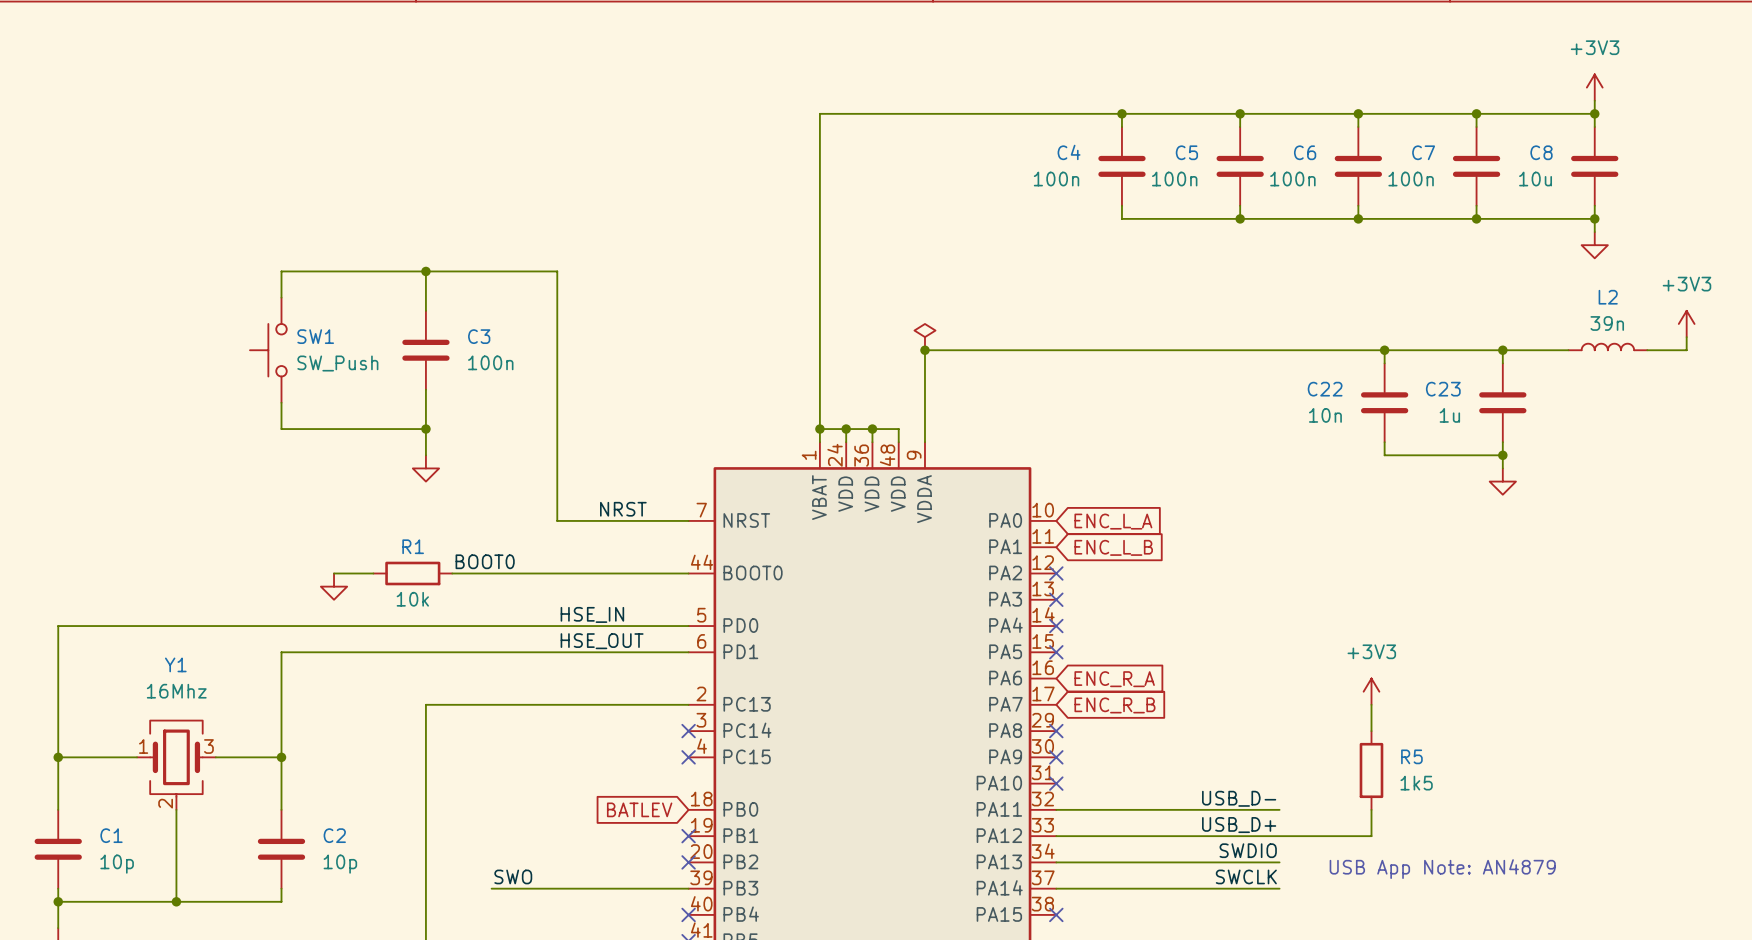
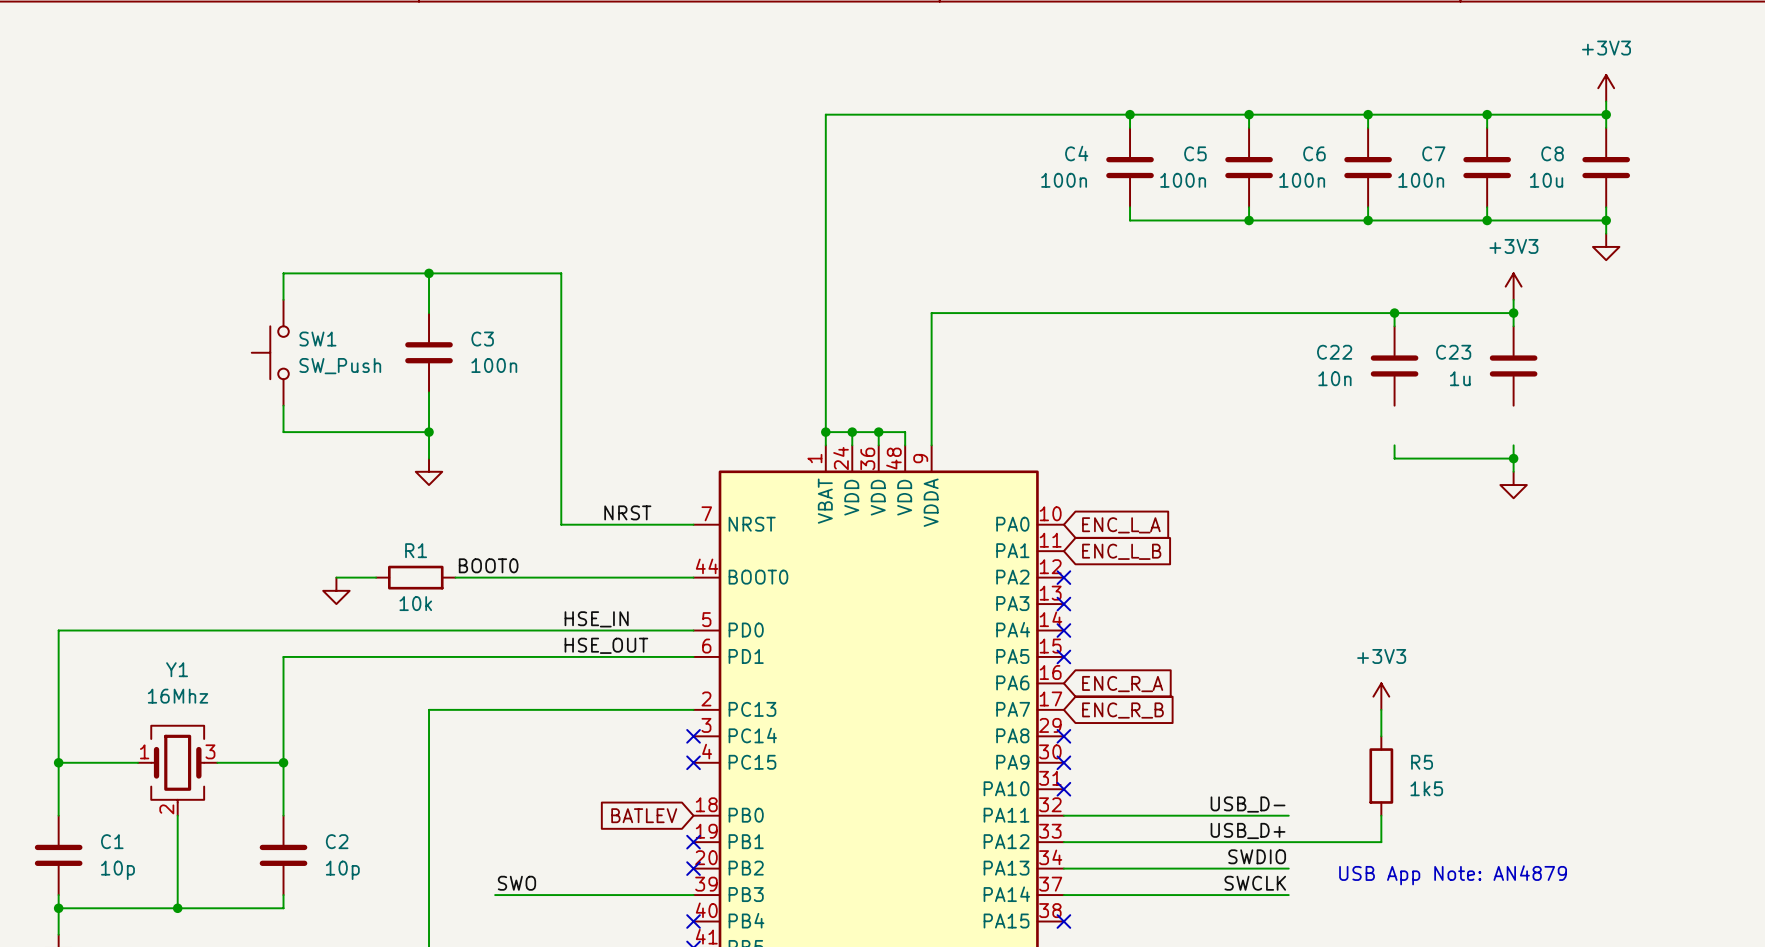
wire: none -> (1513, 299) (1513, 326)
power symbol position: +3V3 (1686, 323) -> +3V3 (1513, 286)
power symbol: (924, 337) -> none
wire: (1686, 337) (1686, 350) (1647, 350) -> none
L2: 39n (1607, 346) -> none
wire: (924, 350) (1568, 350) -> (931, 352) (931, 313) (1513, 313)
junction: (924, 350) -> none
junction position: (1384, 350) -> (1394, 313)
junction position: (1502, 350) -> (1513, 313)
C22 position: (1384, 402) -> (1394, 365)
C23 position: (1502, 402) -> (1513, 365)

